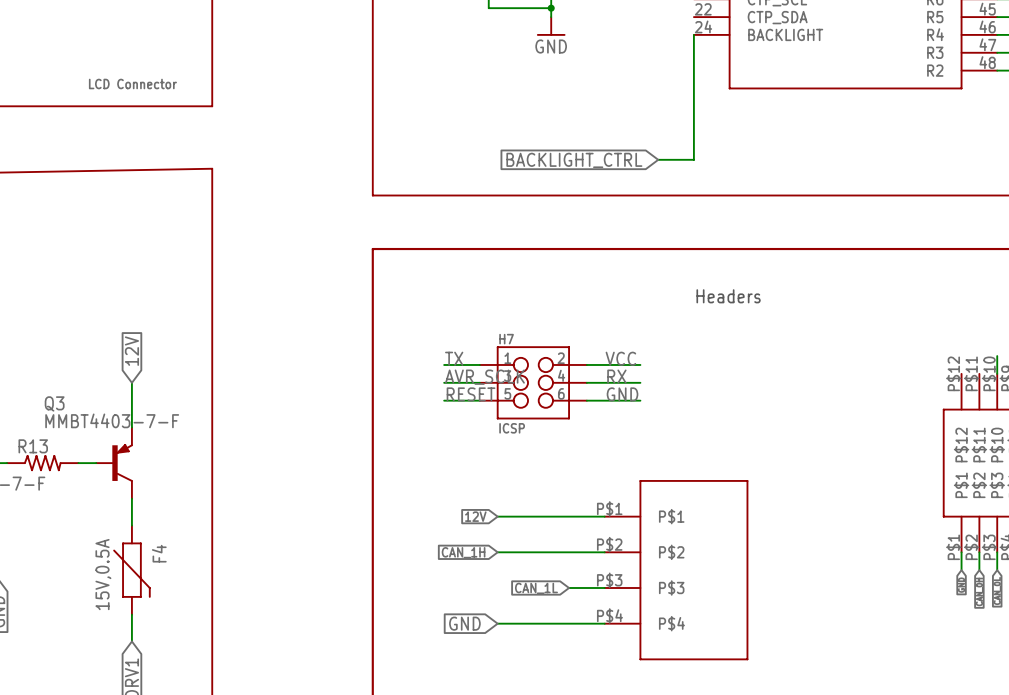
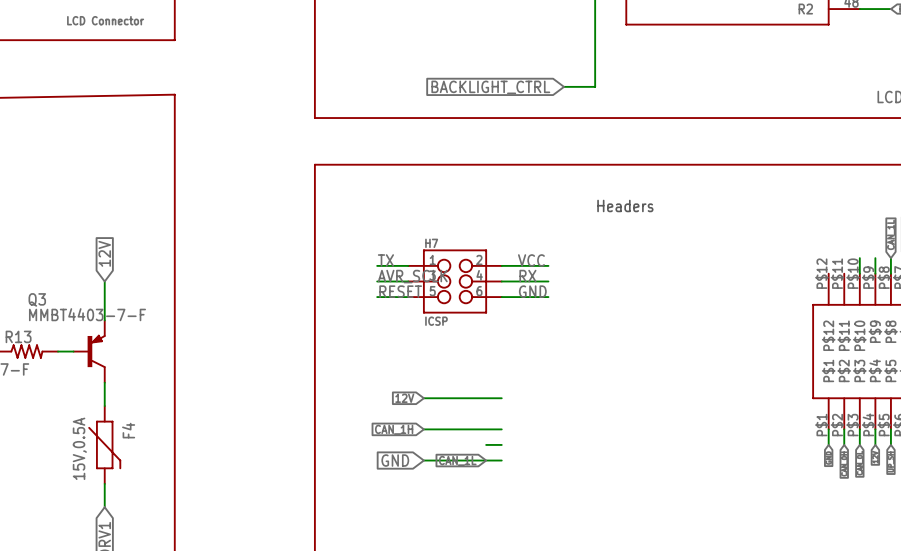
wire: (586, 516) (604, 516) -> none
wire: (586, 552) (604, 552) -> none
part: (676, 570) -> none
wire: none -> (423, 460) (486, 460)
wire: (586, 587) (604, 587) -> (486, 444) (501, 444)
global label position: GND (464, 623) -> GND (395, 460)
wire: (497, 623) (604, 623) -> none

